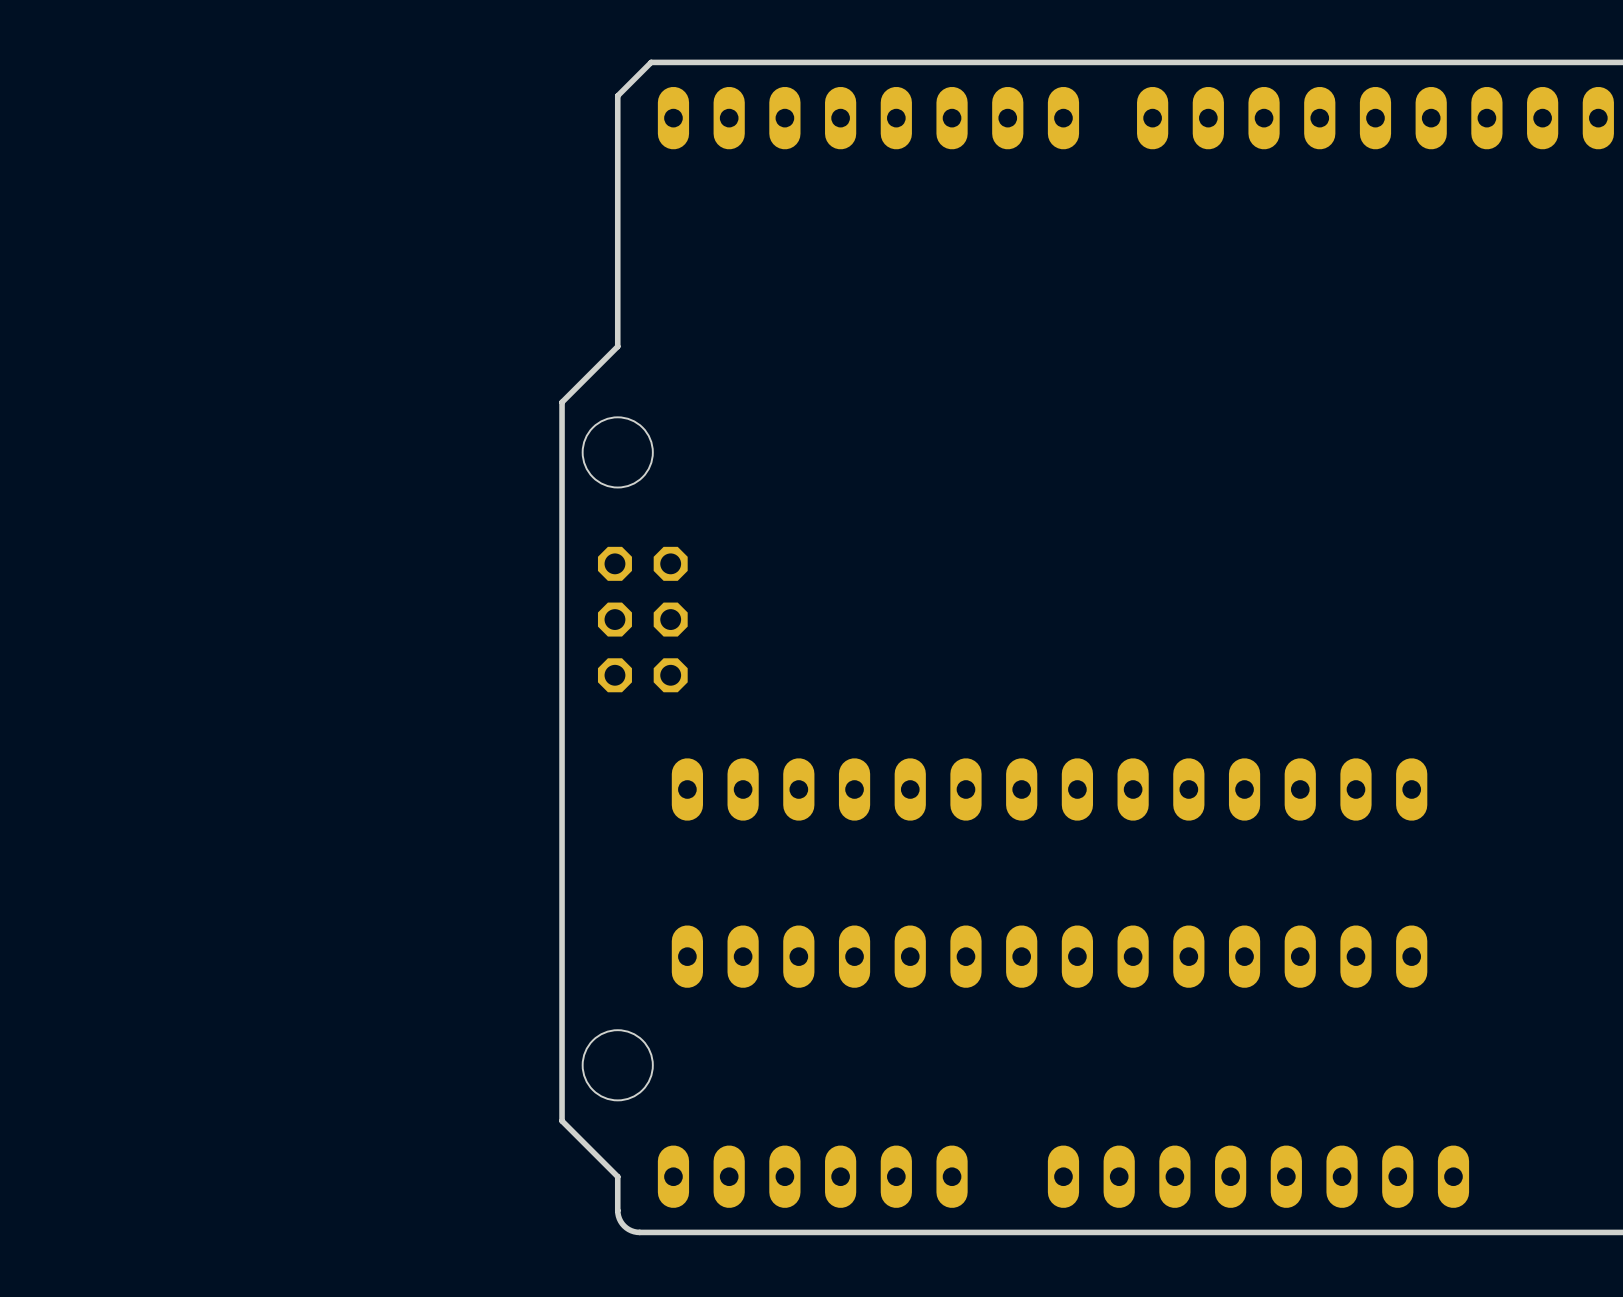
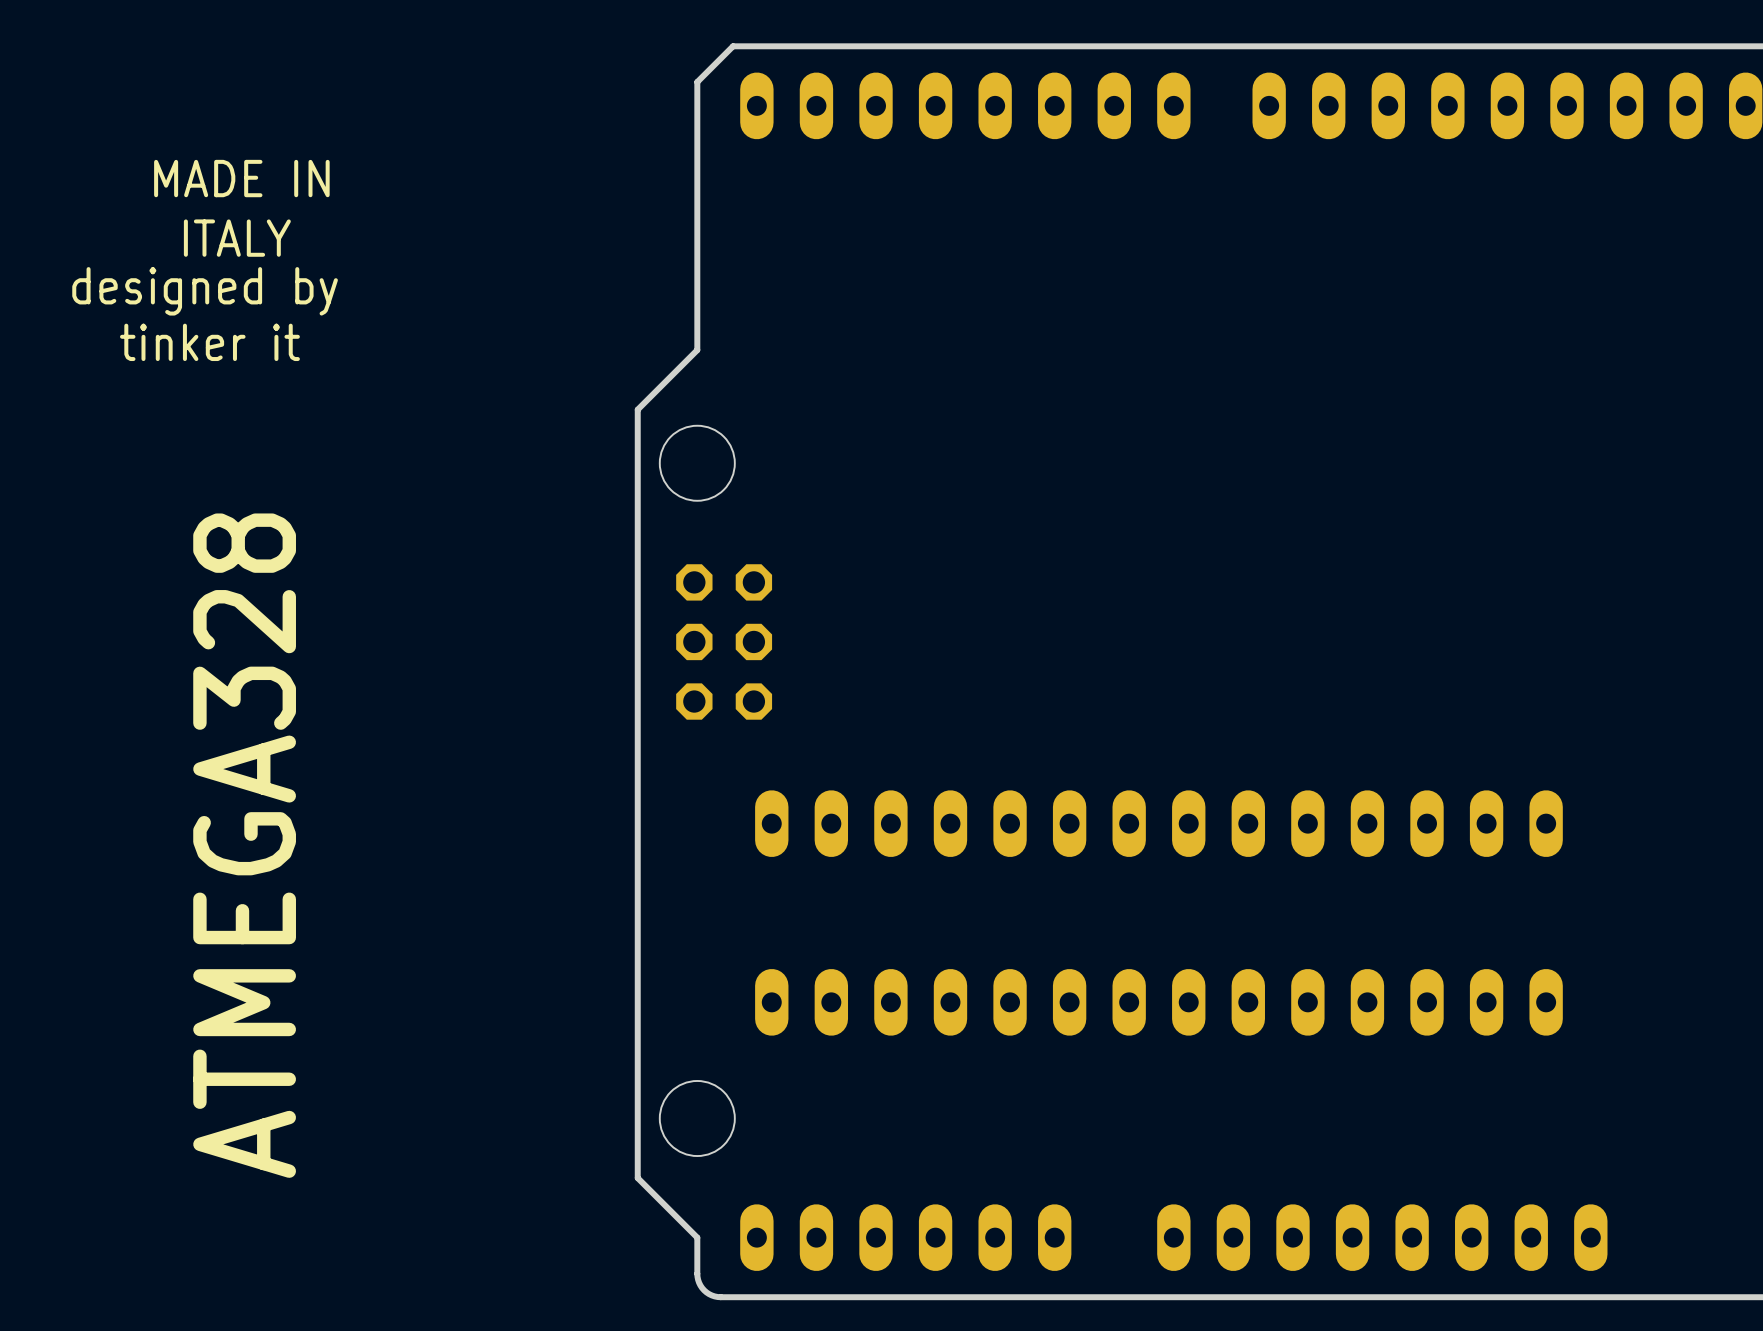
text: none -> MADE IN (241, 178)
text: none -> ITALY (237, 238)
text: none -> designed by (205, 291)
text: none -> tinker it (209, 342)
text: none -> ATMEGA328 (244, 845)

